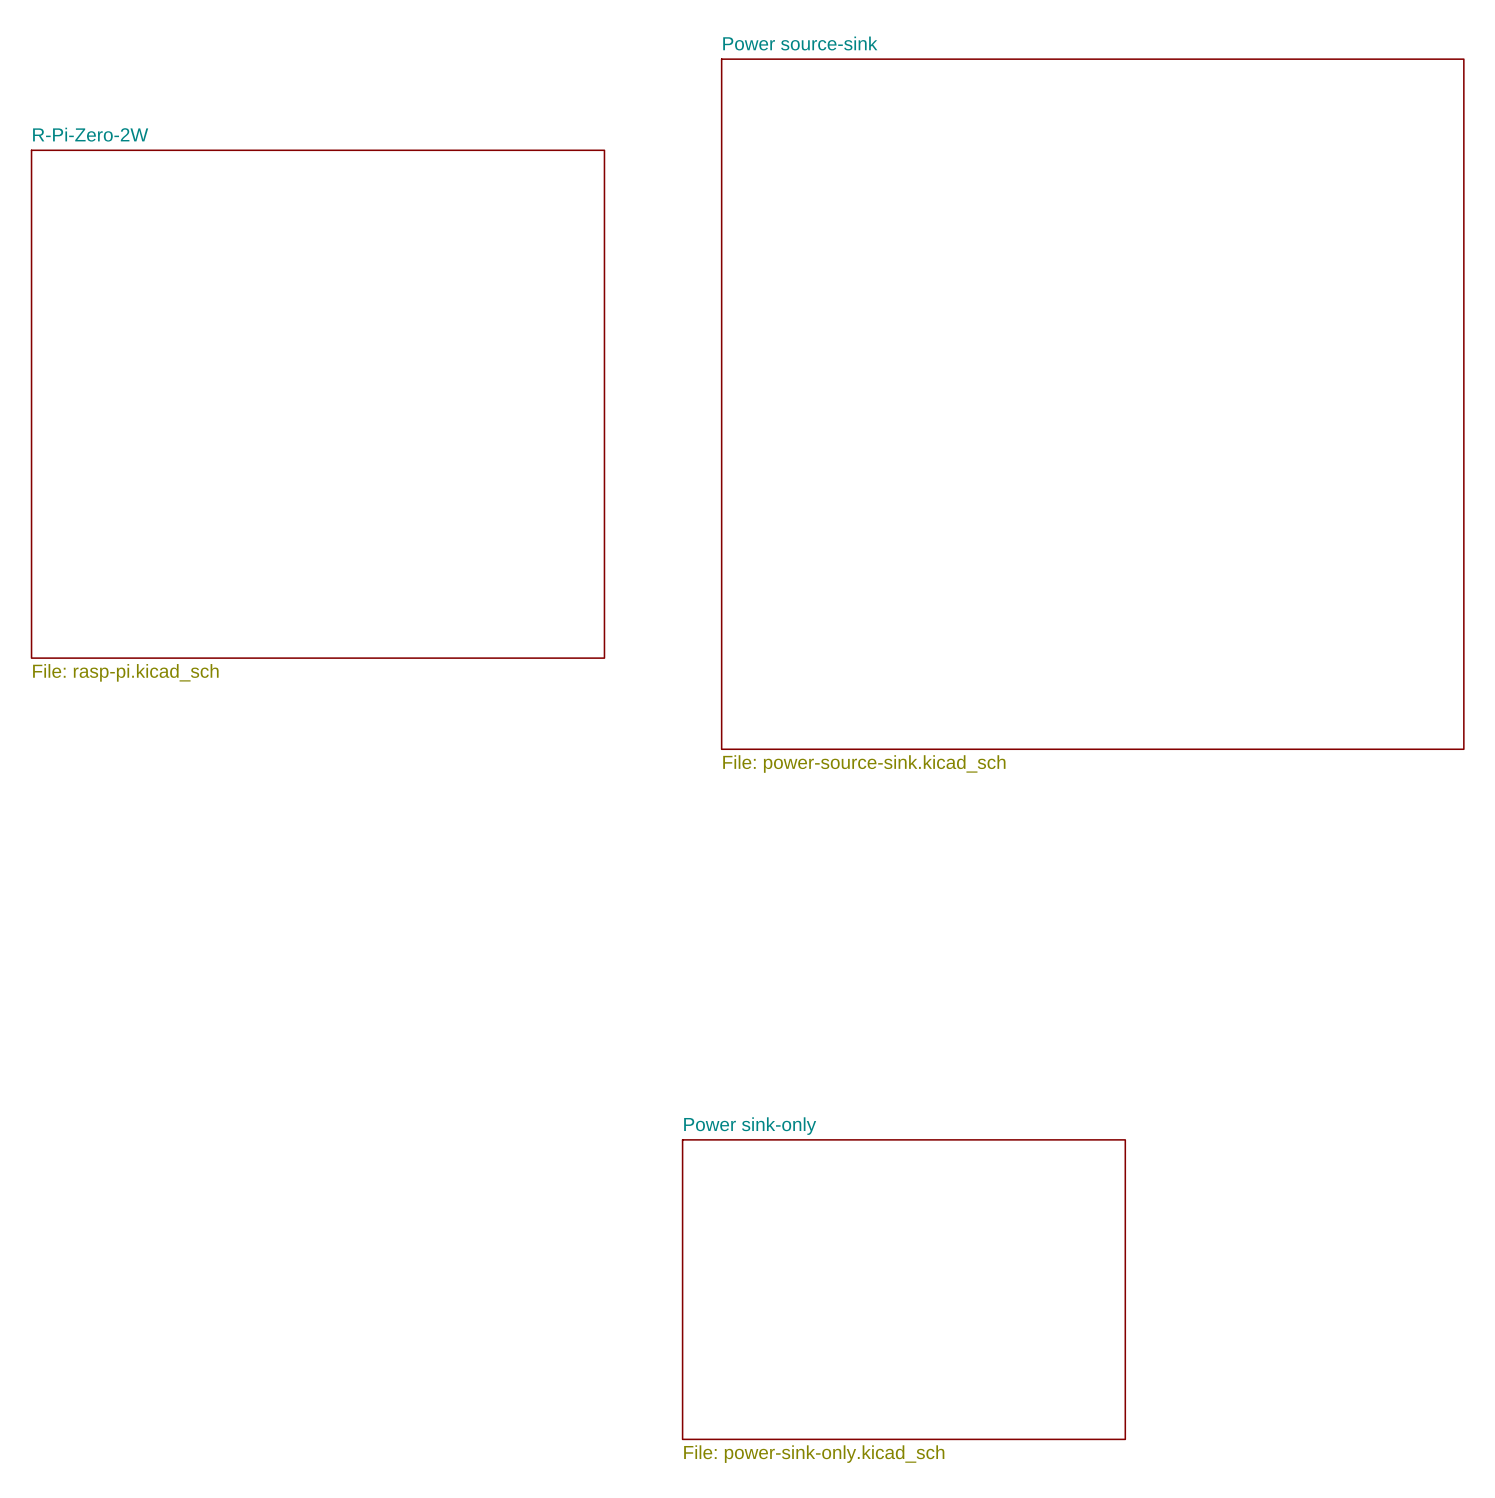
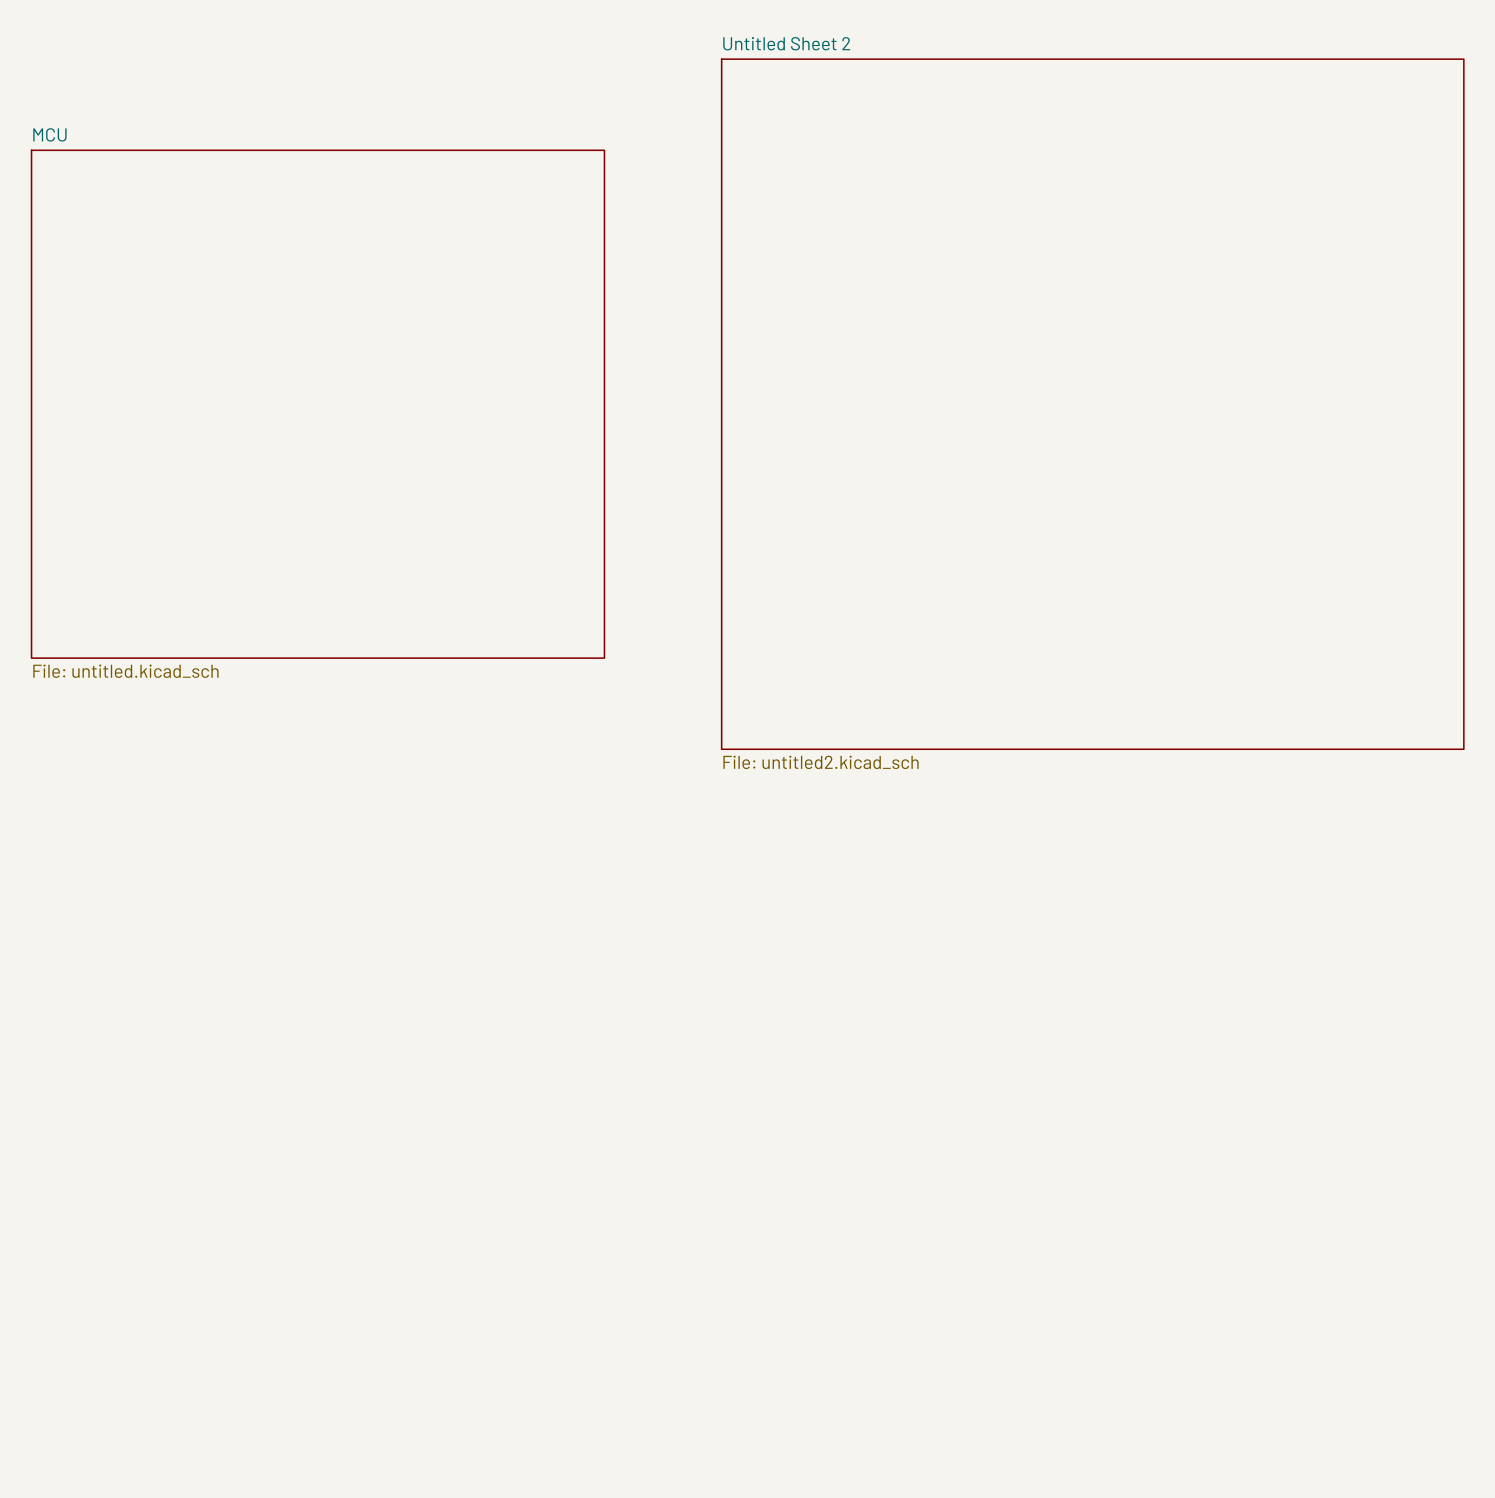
sheet Power source-sink name: Power source-sink (800, 43) -> Untitled Sheet 2 (786, 43)
sheet R-Pi-Zero-2W name: R-Pi-Zero-2W (90, 134) -> MCU (49, 134)
sheet R-Pi-Zero-2W value: File: rasp-pi.kicad_sch (125, 672) -> File: untitled.kicad_sch (125, 671)
sheet Power source-sink value: File: power-source-sink.kicad_sch (864, 764) -> File: untitled2.kicad_sch (821, 762)
sheet Power sink-only: File: power-sink-only.kicad_sch (903, 1289) -> none

